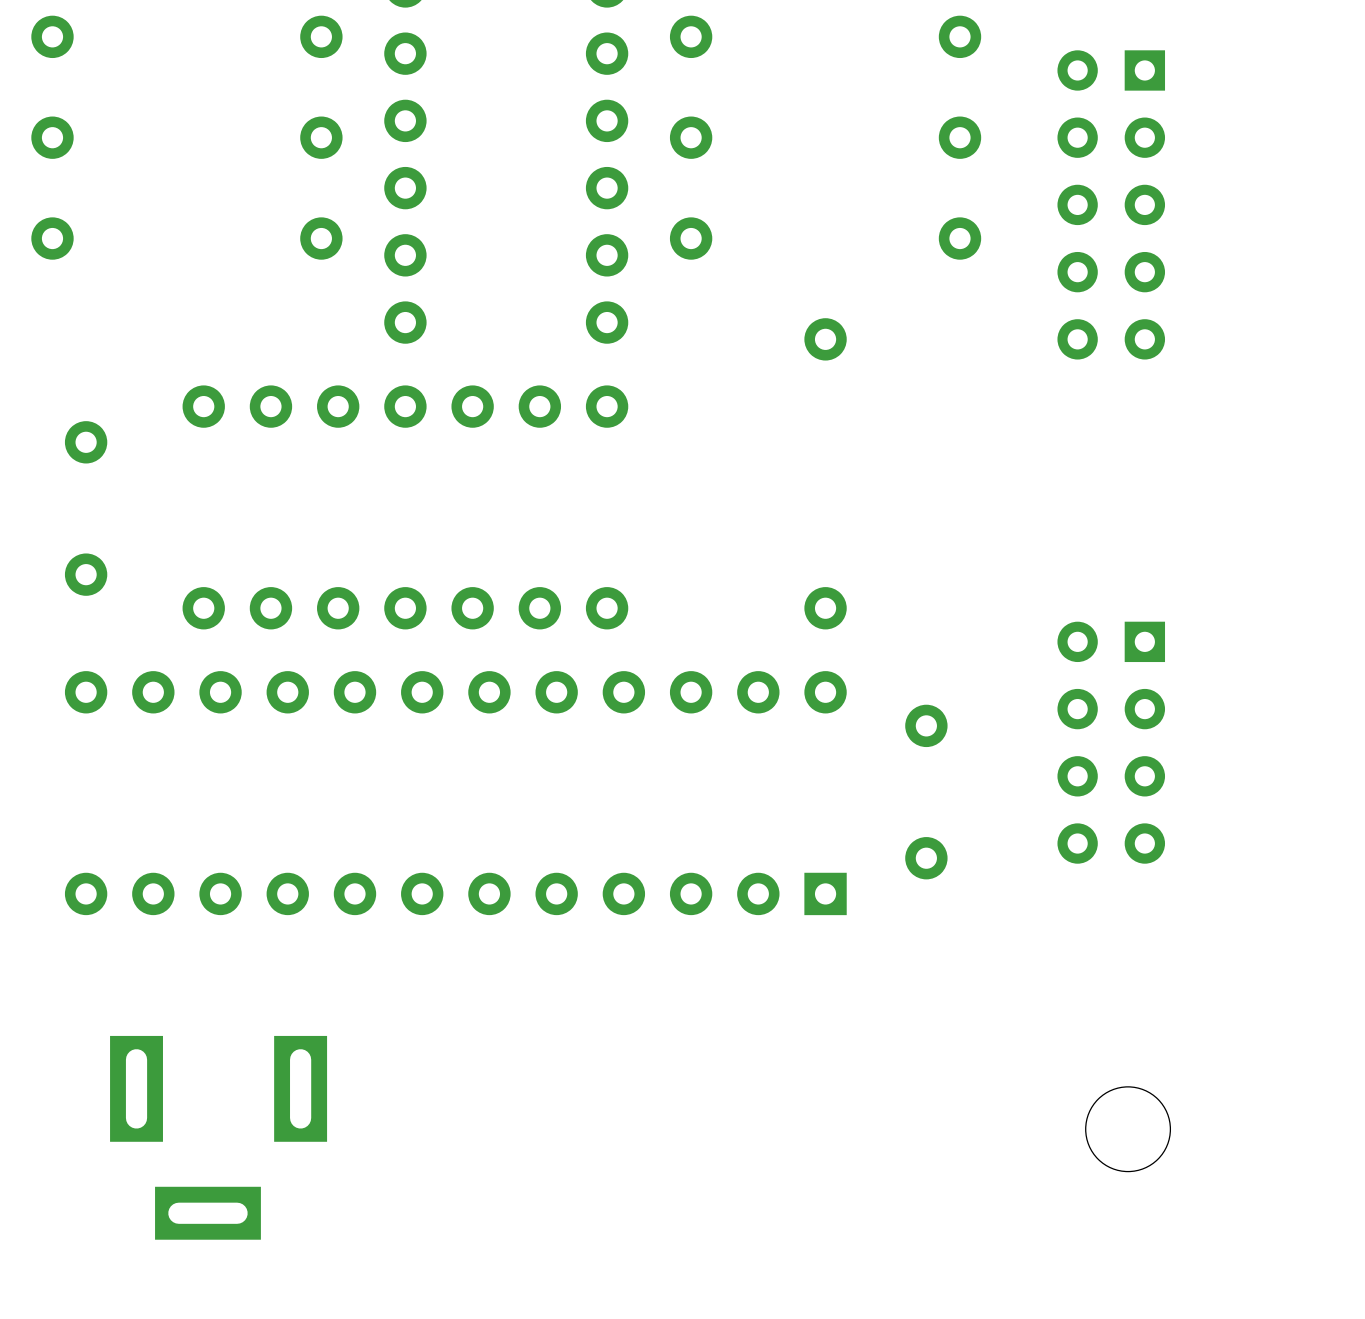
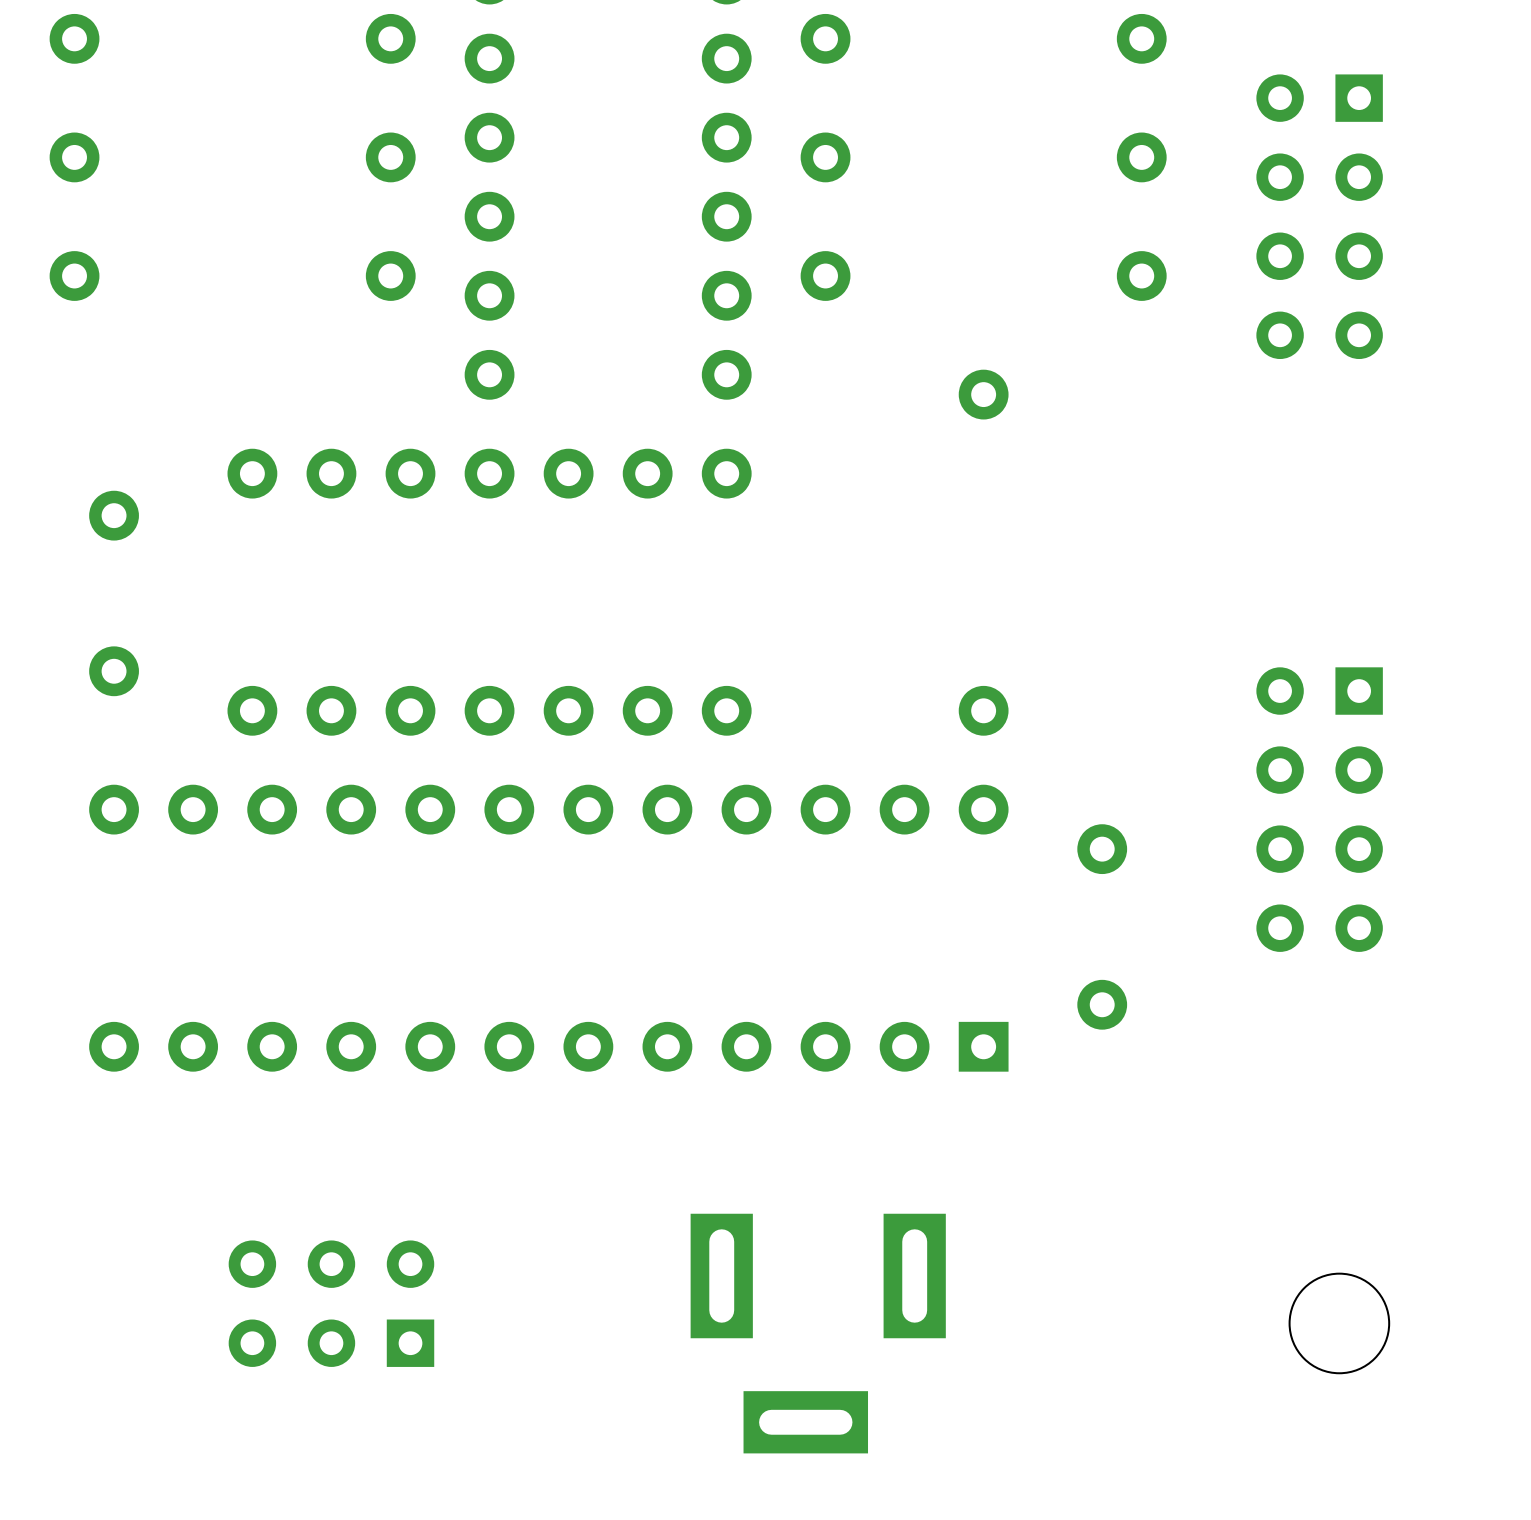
part footprint: [1057, 50, 1166, 360] -> [1256, 74, 1383, 360]
part position: (1111, 742) -> (1319, 809)
part: none -> (331, 1303)
part position: (218, 1137) -> (818, 1333)

